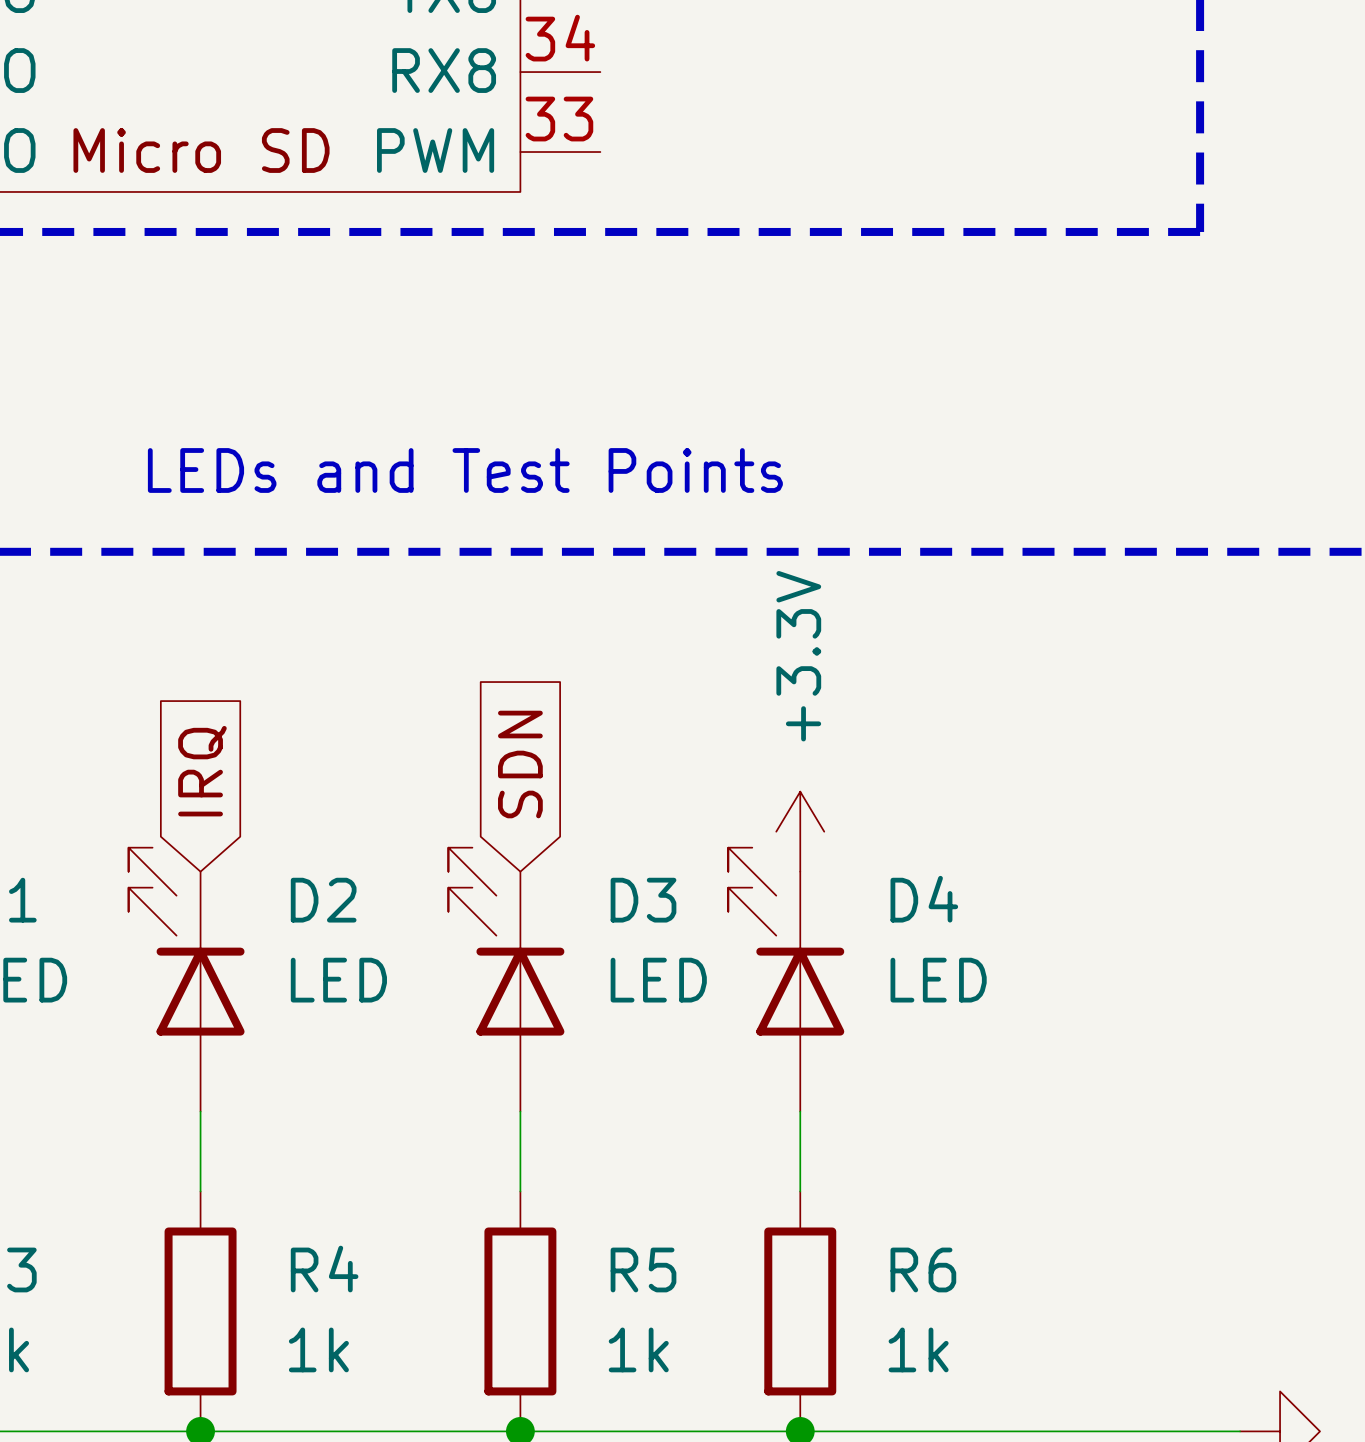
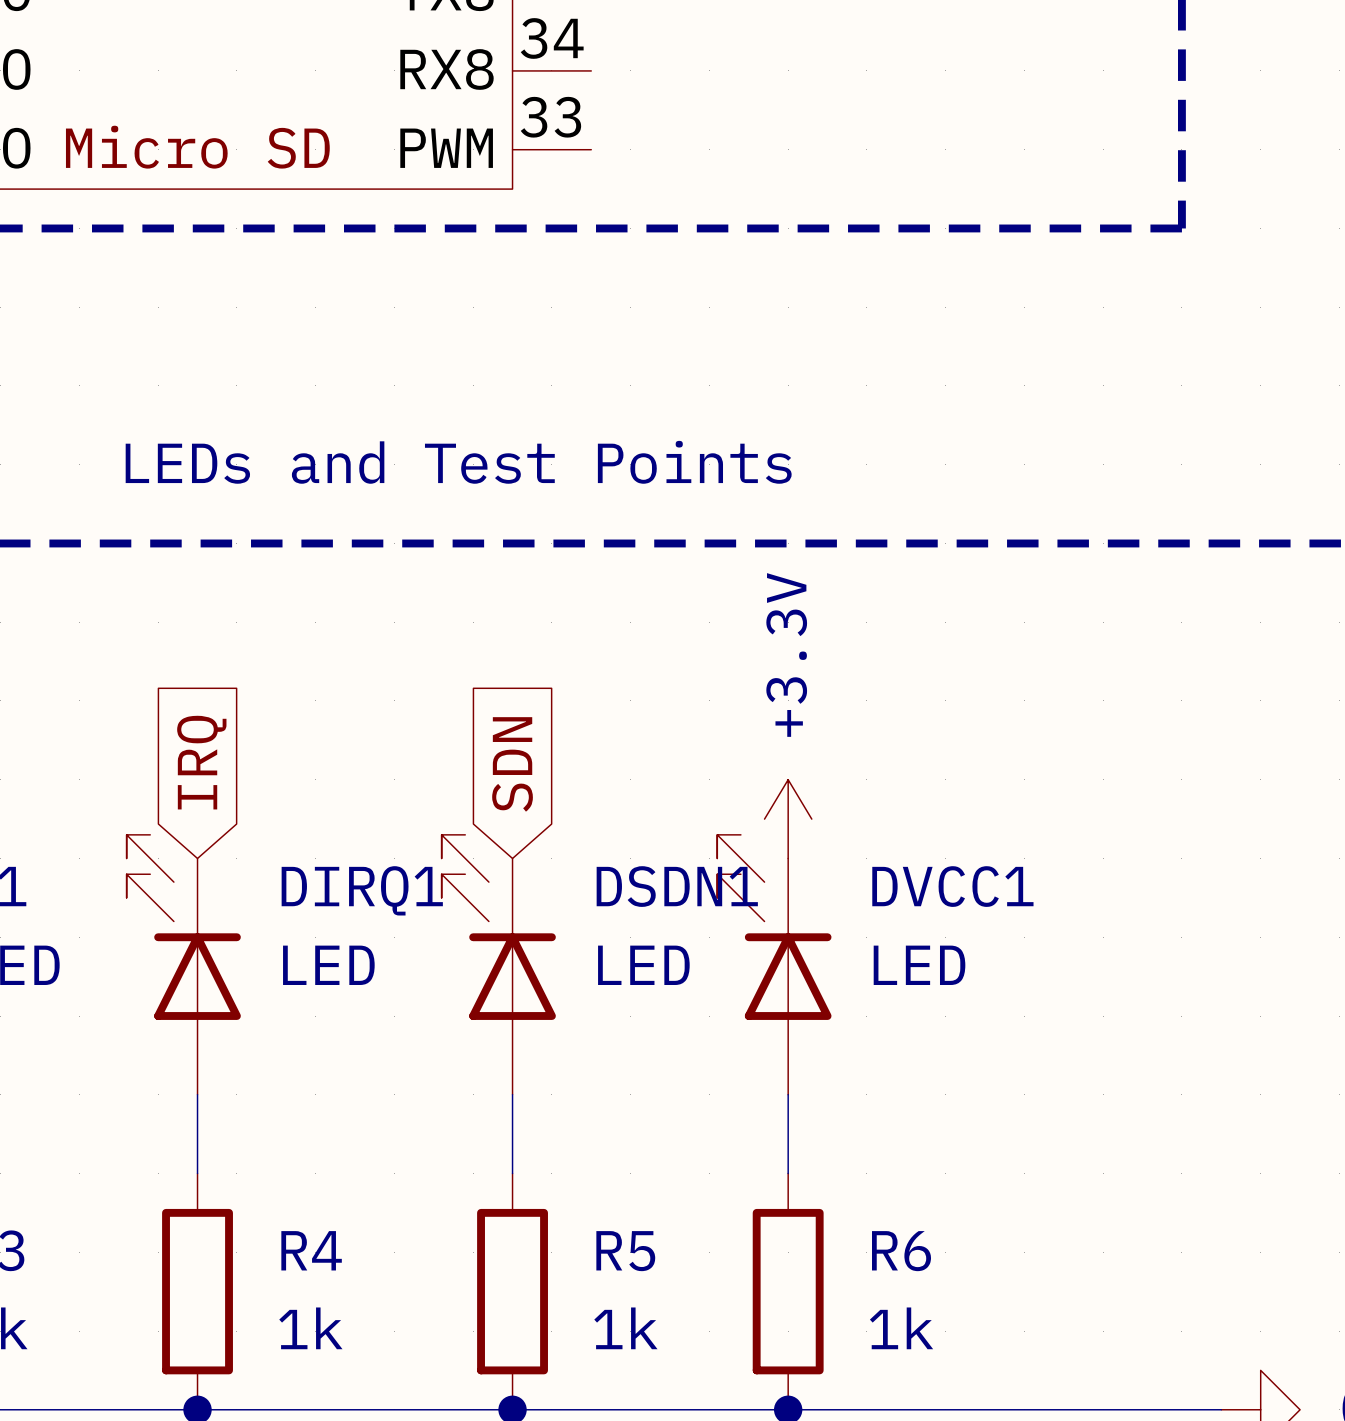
D4 name: D4 (924, 899) -> DVCC1 (952, 886)
D2 name: D2 (323, 900) -> DIRQ1 (362, 890)
D3 name: D3 (643, 900) -> DSDN1 (677, 886)

